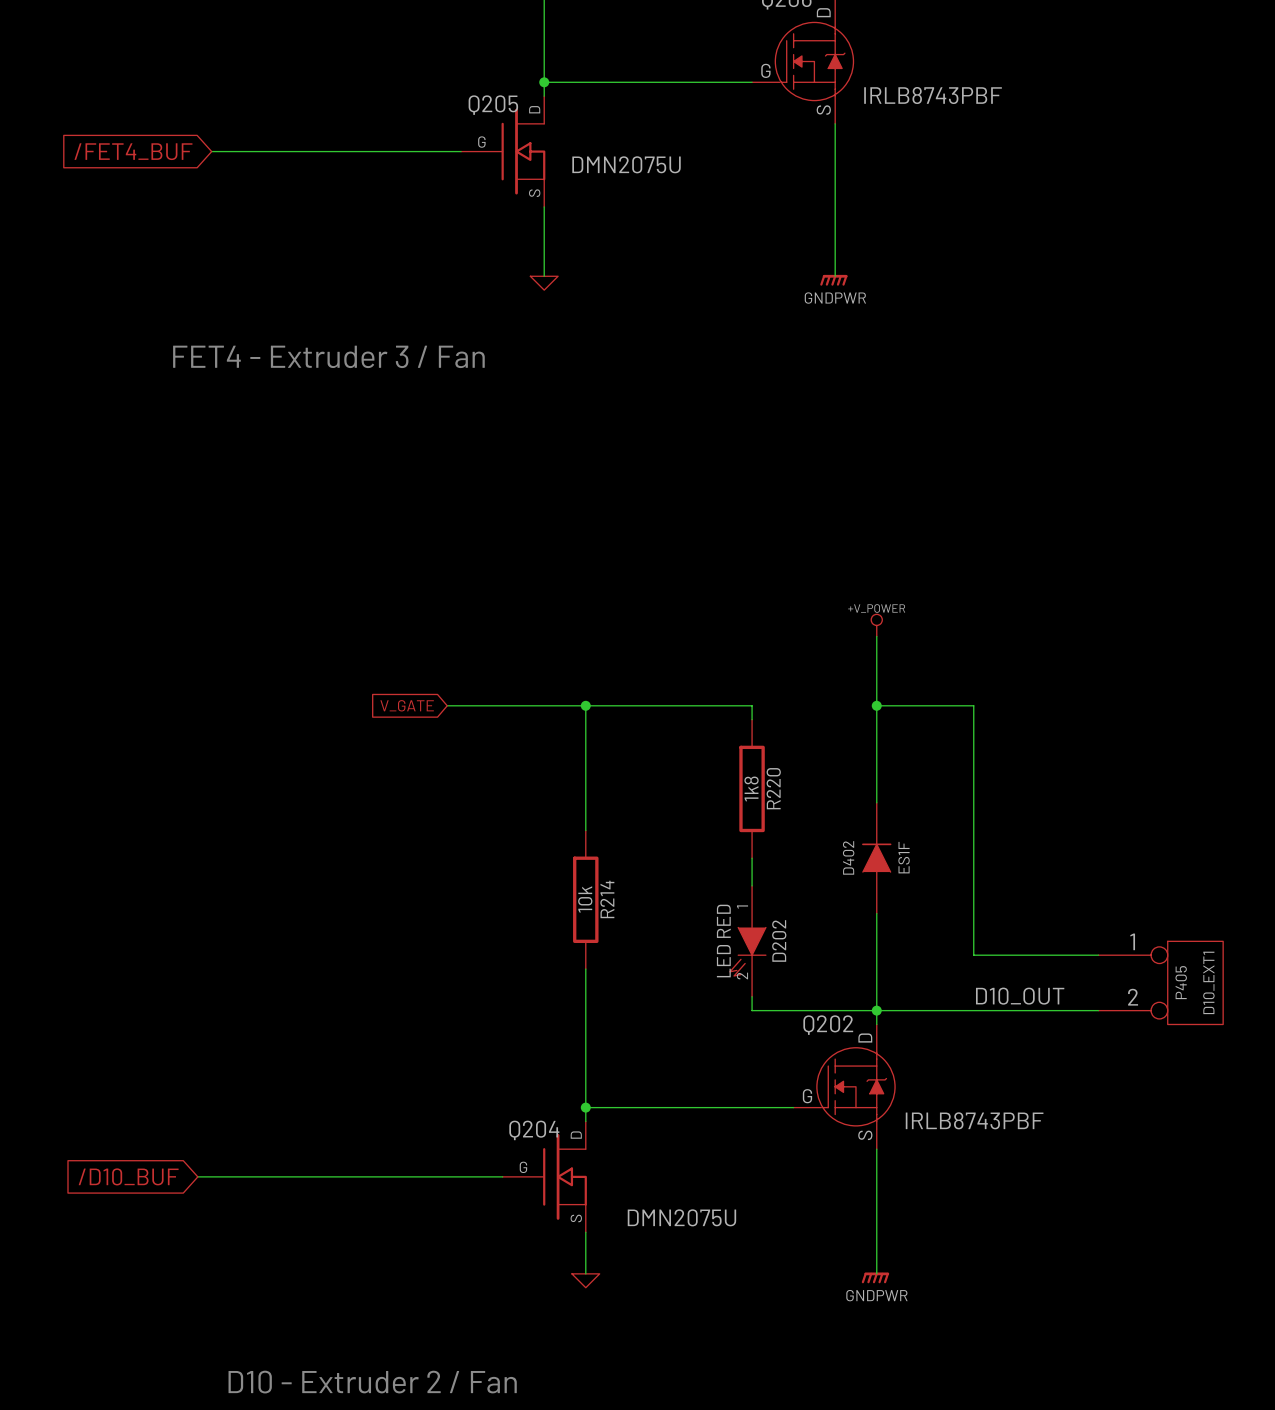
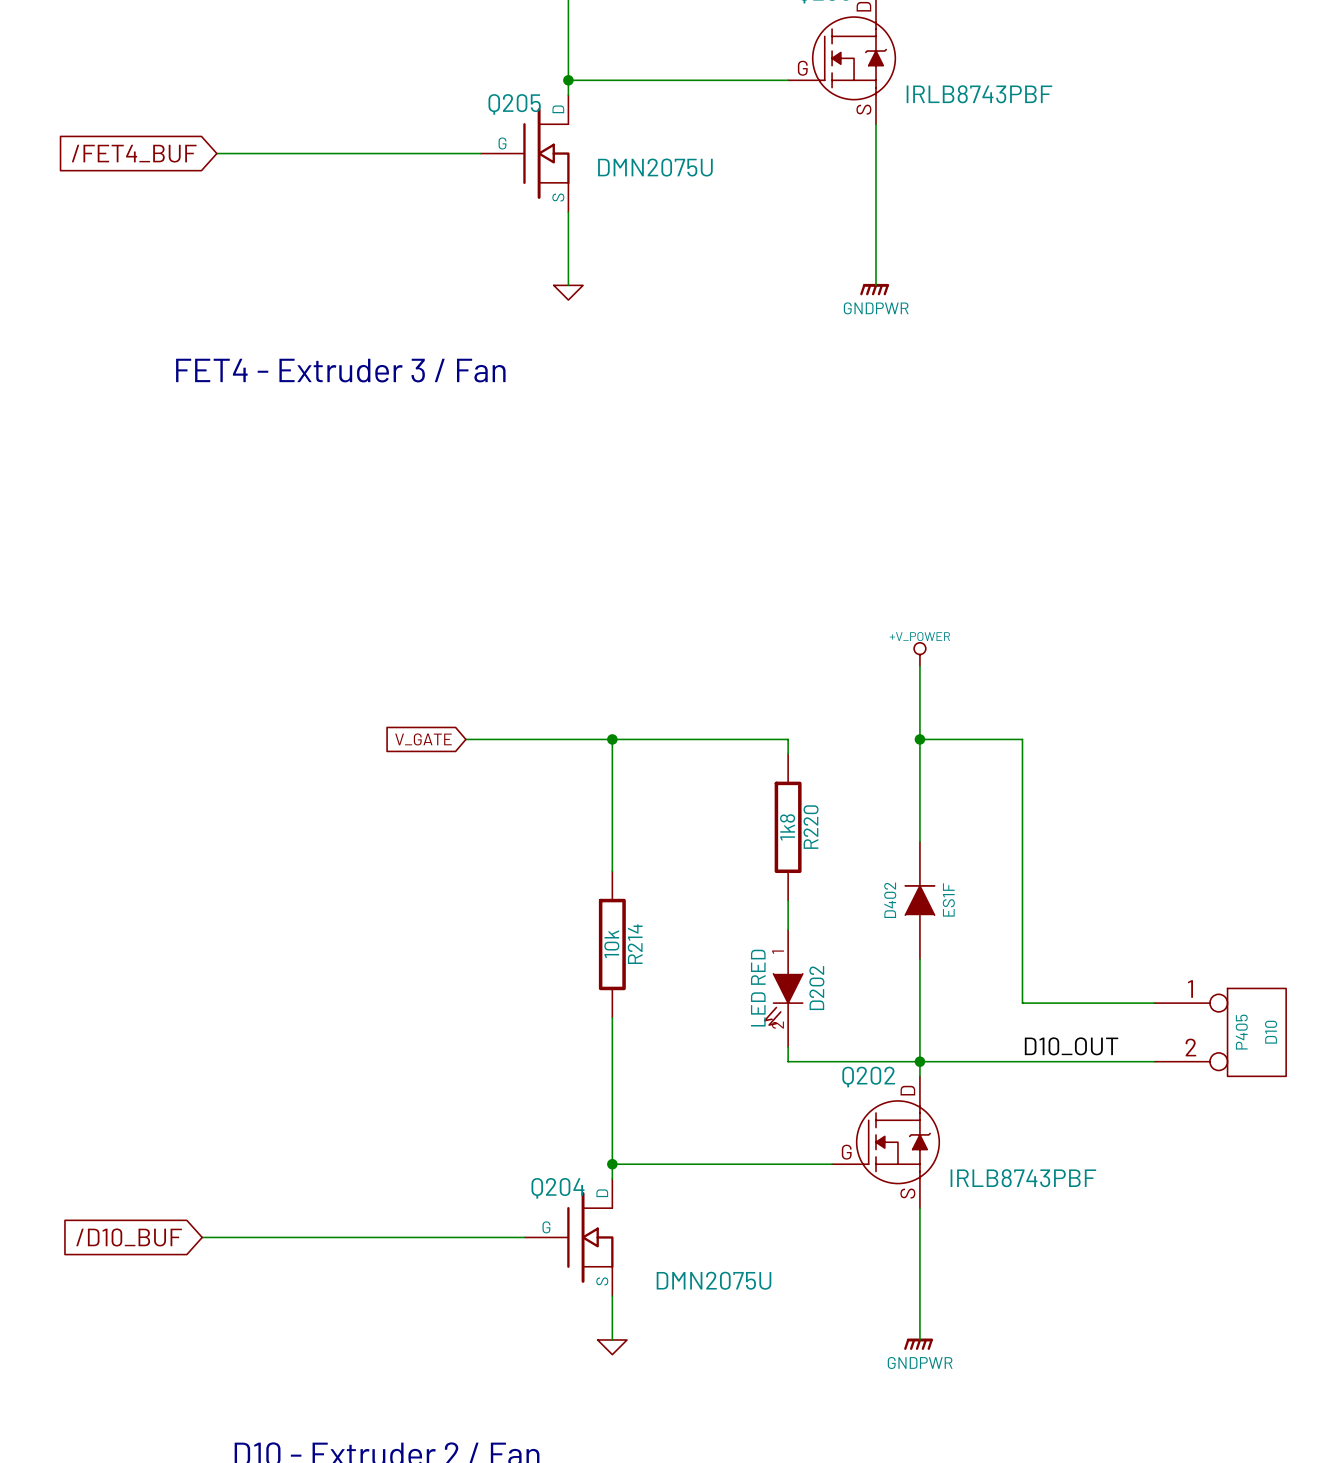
P405 value: D10_EXT1 (1208, 982) -> D10 (1271, 1032)

